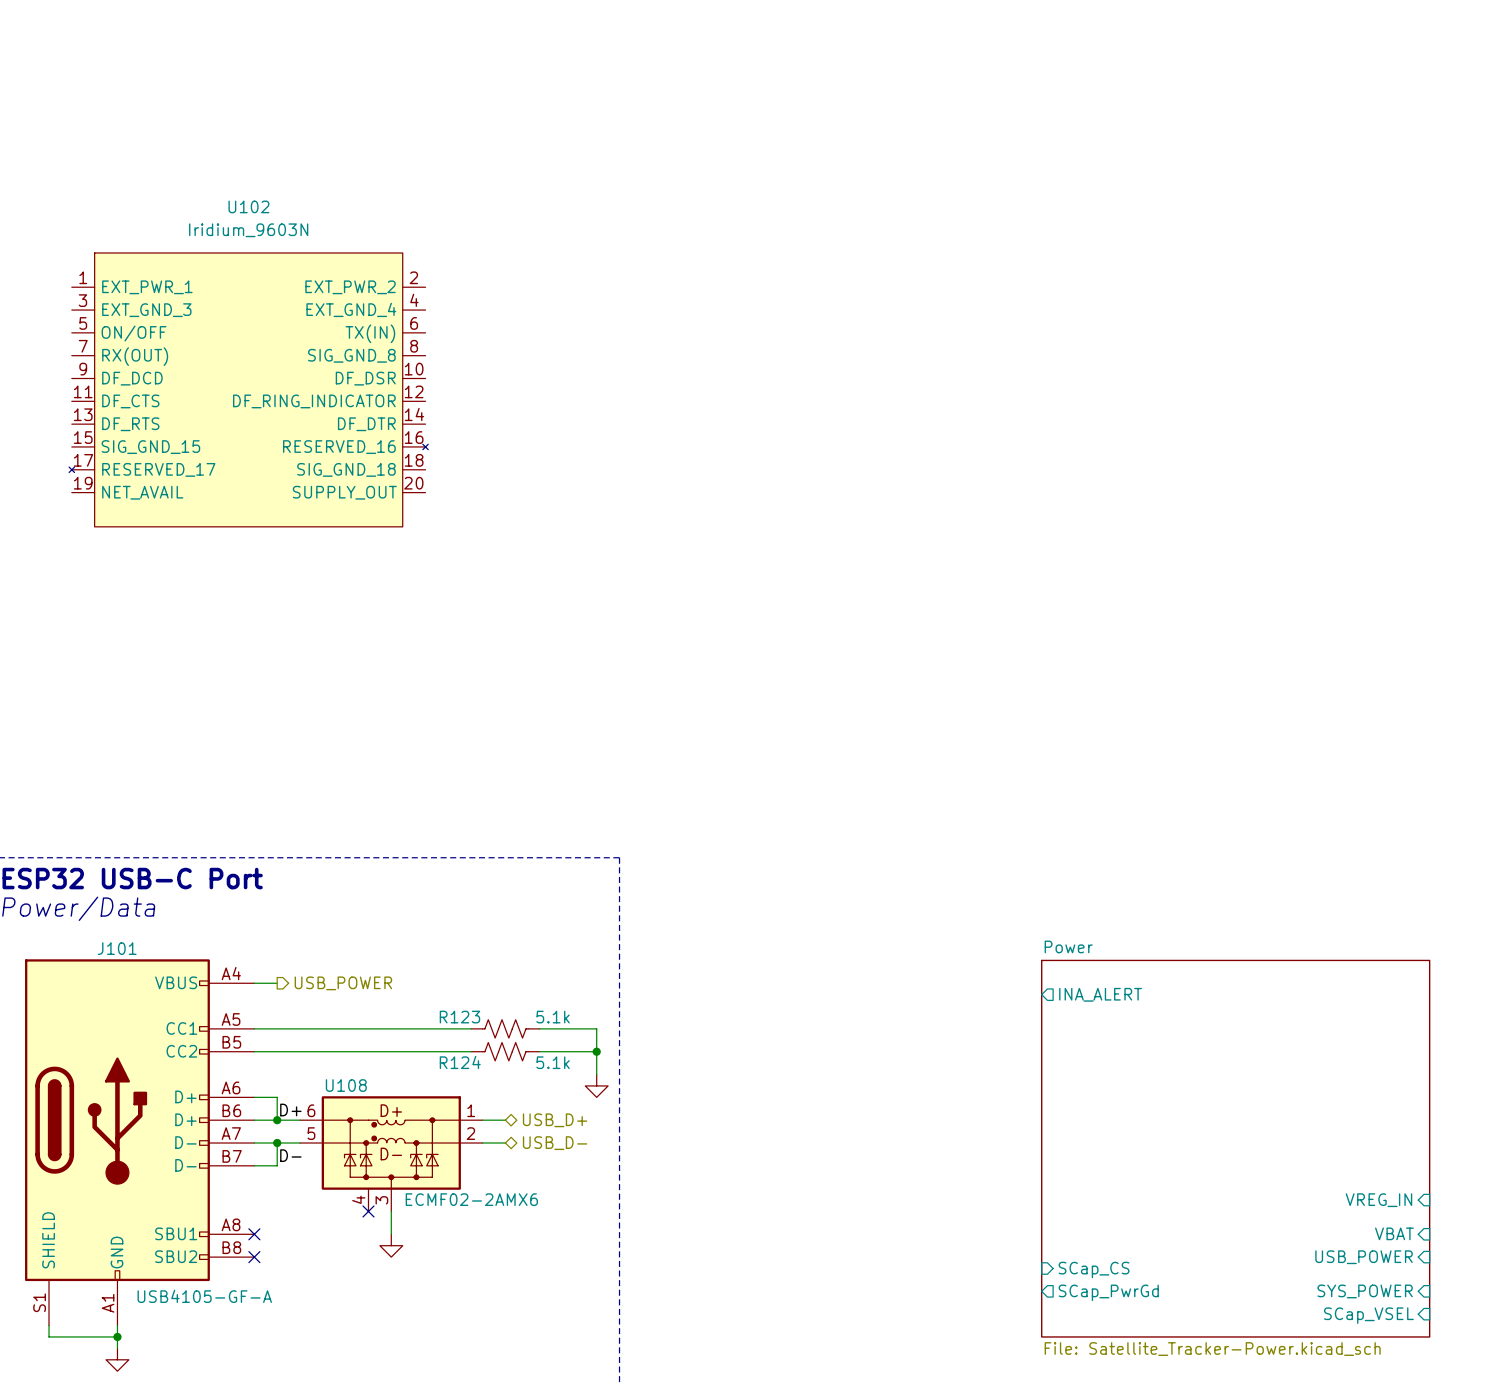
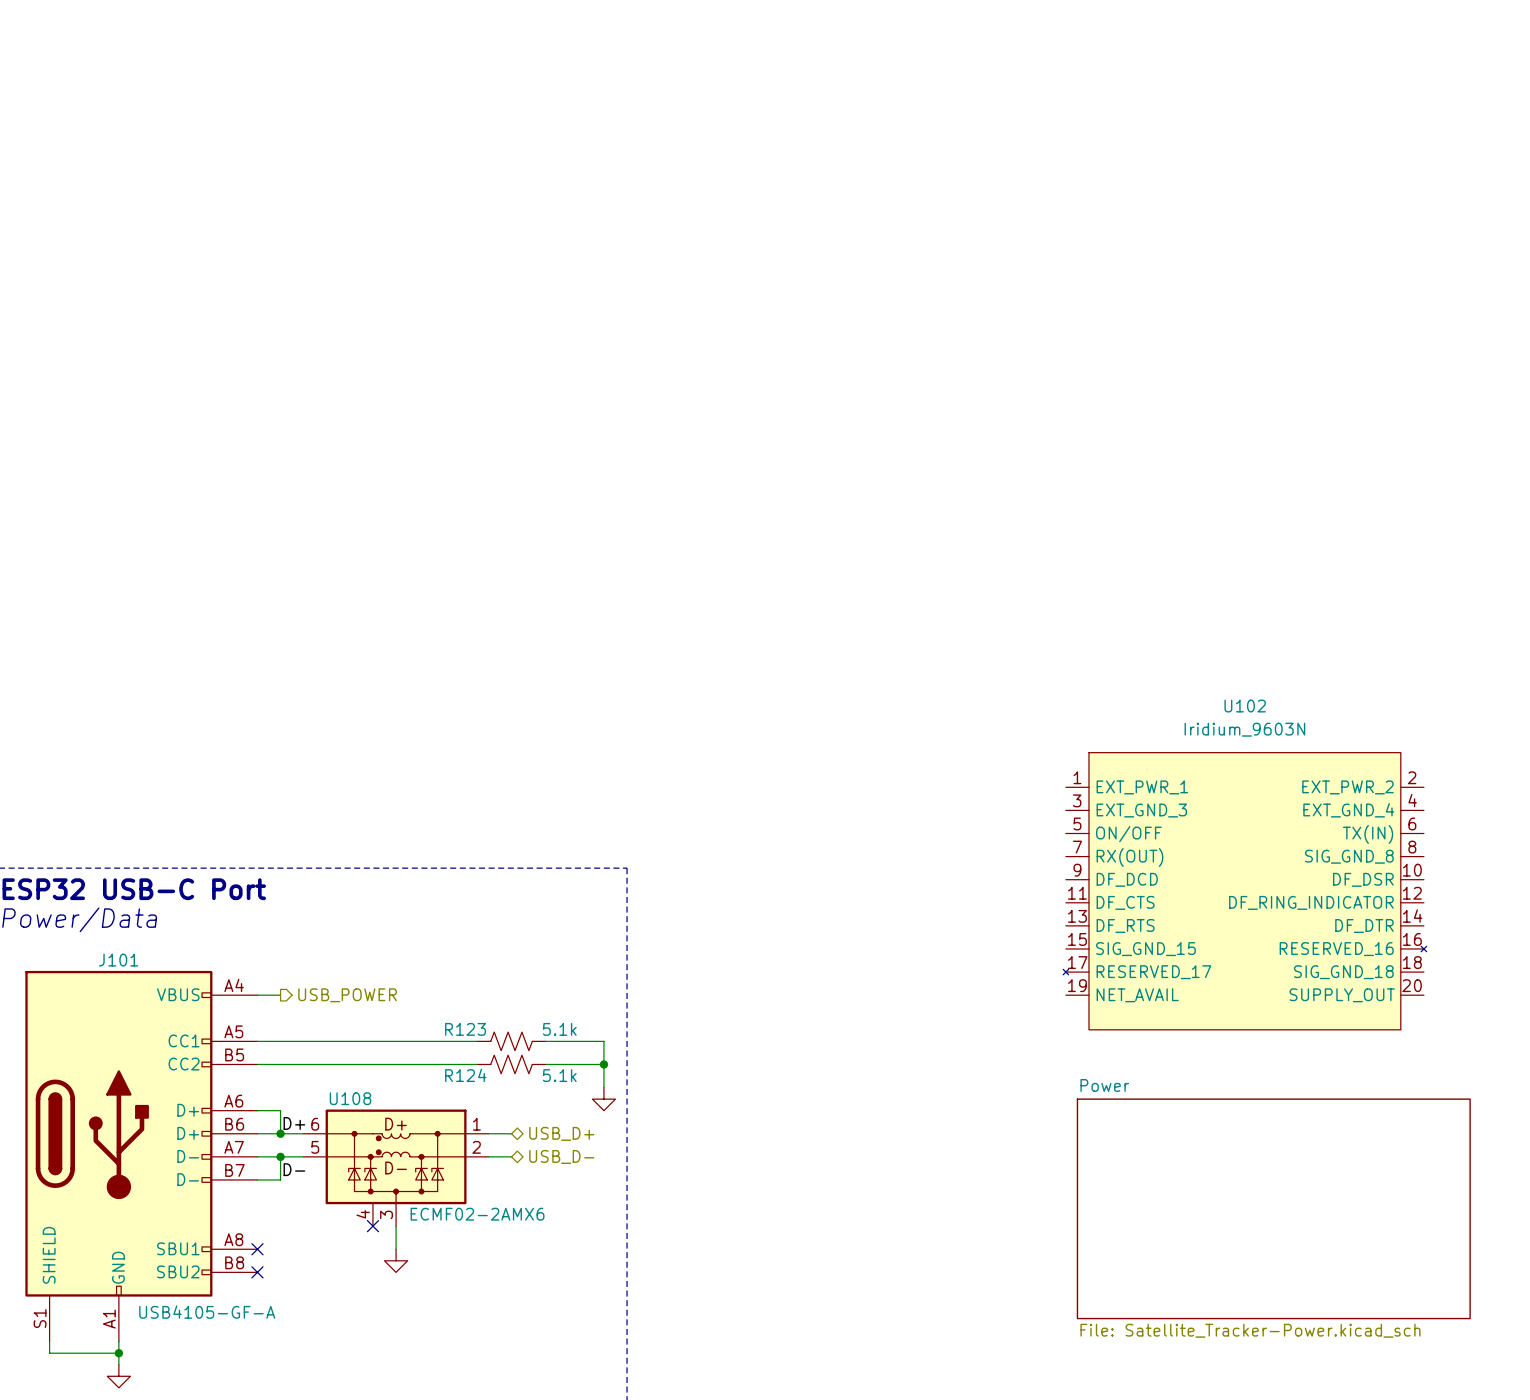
U102 position: (248, 389) -> (1244, 891)
sheet pin: INA_ALERT (1100, 994) -> none
sheet Power: File: Satellite_Tracker-Power.kicad_sch (1235, 1148) -> none
sheet Power: none -> File: Satellite_Tracker-Power.kicad_sch (1273, 1208)
sheet pin: VREG_IN (1378, 1200) -> none
sheet pin: VBAT (1394, 1233) -> none
sheet pin: USB_POWER (1364, 1257) -> none
sheet pin: SCap_CS (1094, 1269) -> none
sheet pin: SYS_POWER (1365, 1291) -> none
sheet pin: SCap_PwrGd (1108, 1292) -> none
sheet pin: SCap_VSEL (1368, 1315) -> none

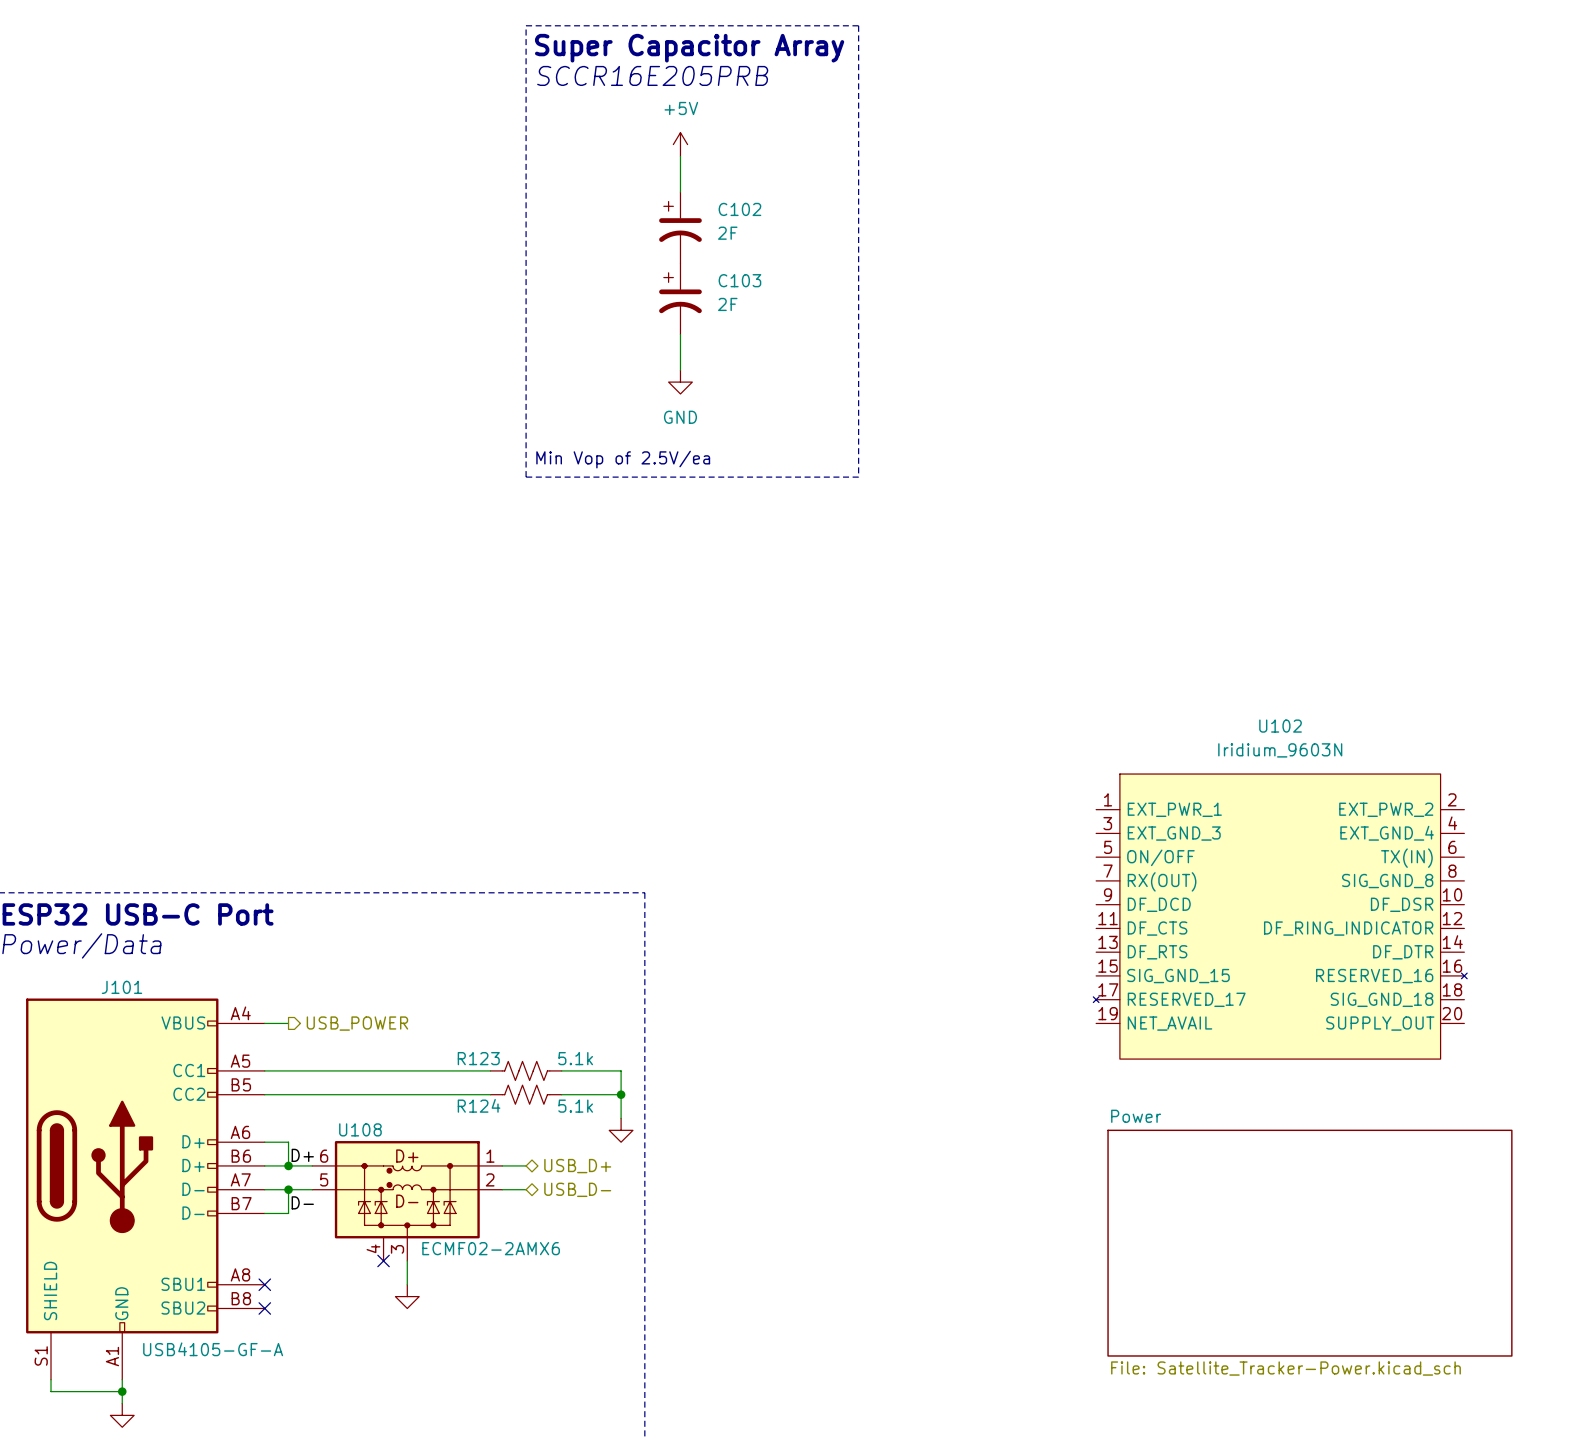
line: none -> (526, 25) (858, 25) (858, 477) (526, 477) (526, 25)
text: none -> Super Capacitor Array (689, 48)
text: none -> SCCR16E205PRB (652, 75)
power symbol: none -> +5V (680, 144)
wire: none -> (680, 156) (680, 192)
C102: none -> 2F (680, 227)
C103: none -> 2F (680, 298)
wire: none -> (680, 334) (680, 370)
power symbol: none -> GND (680, 382)
text: none -> Min Vop of 2.5V/ea (623, 459)

